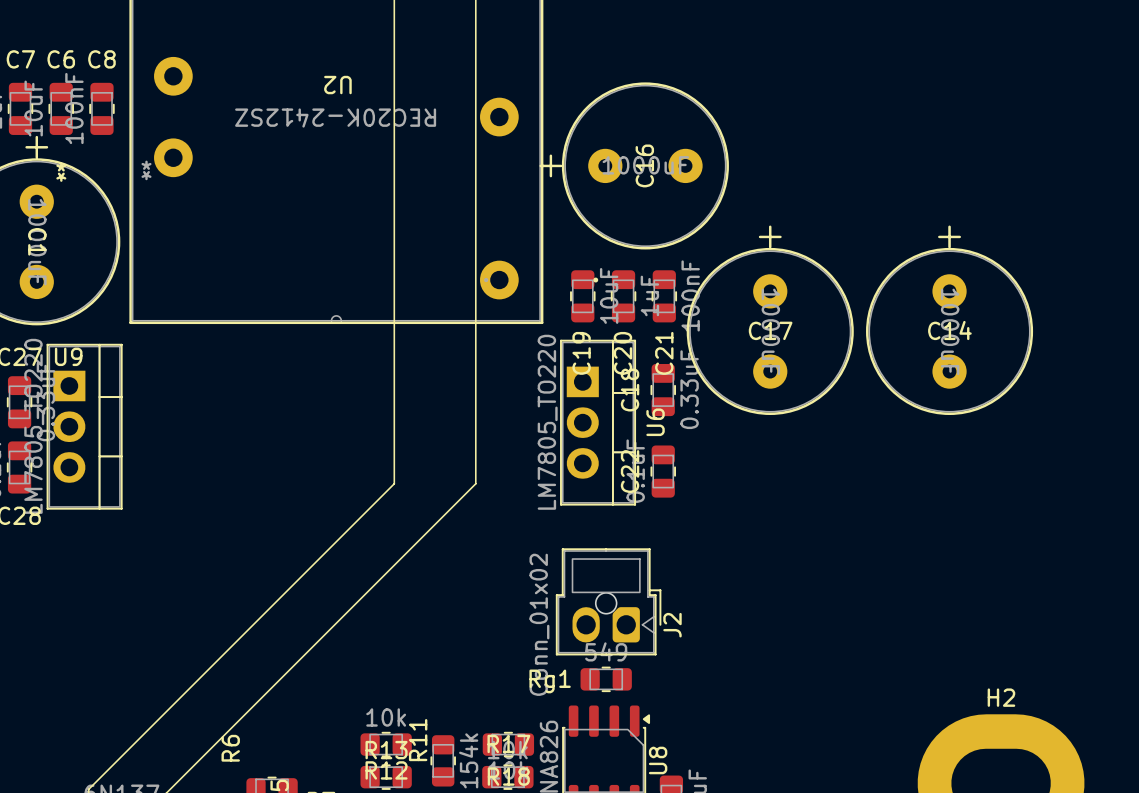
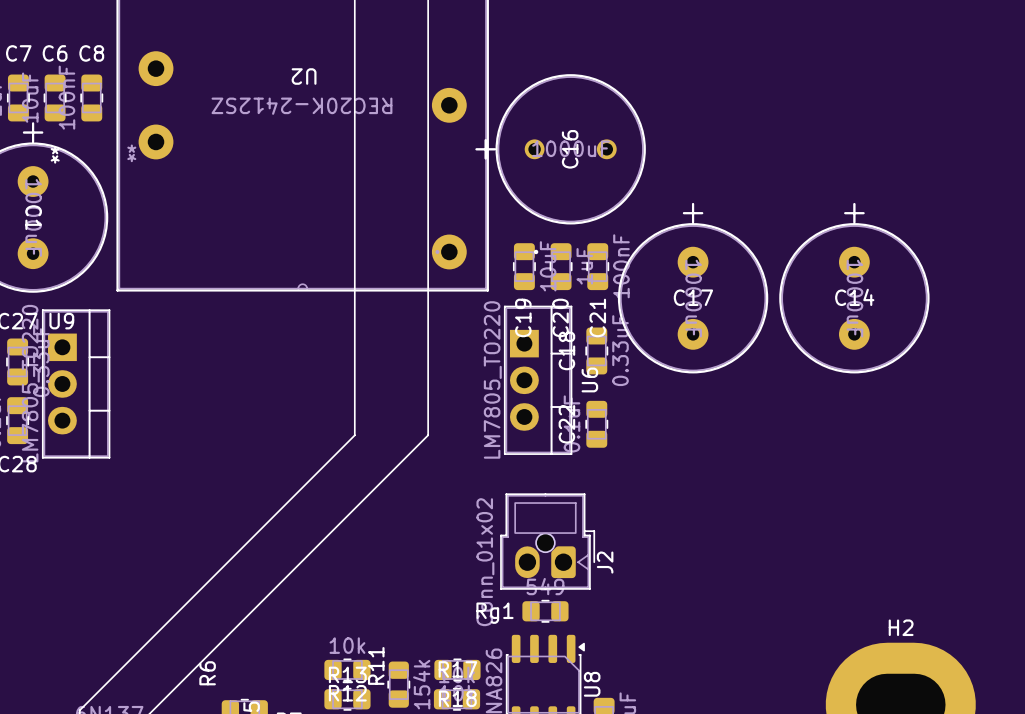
C16 footprint: [539, 82, 729, 250] -> [475, 74, 646, 225]

